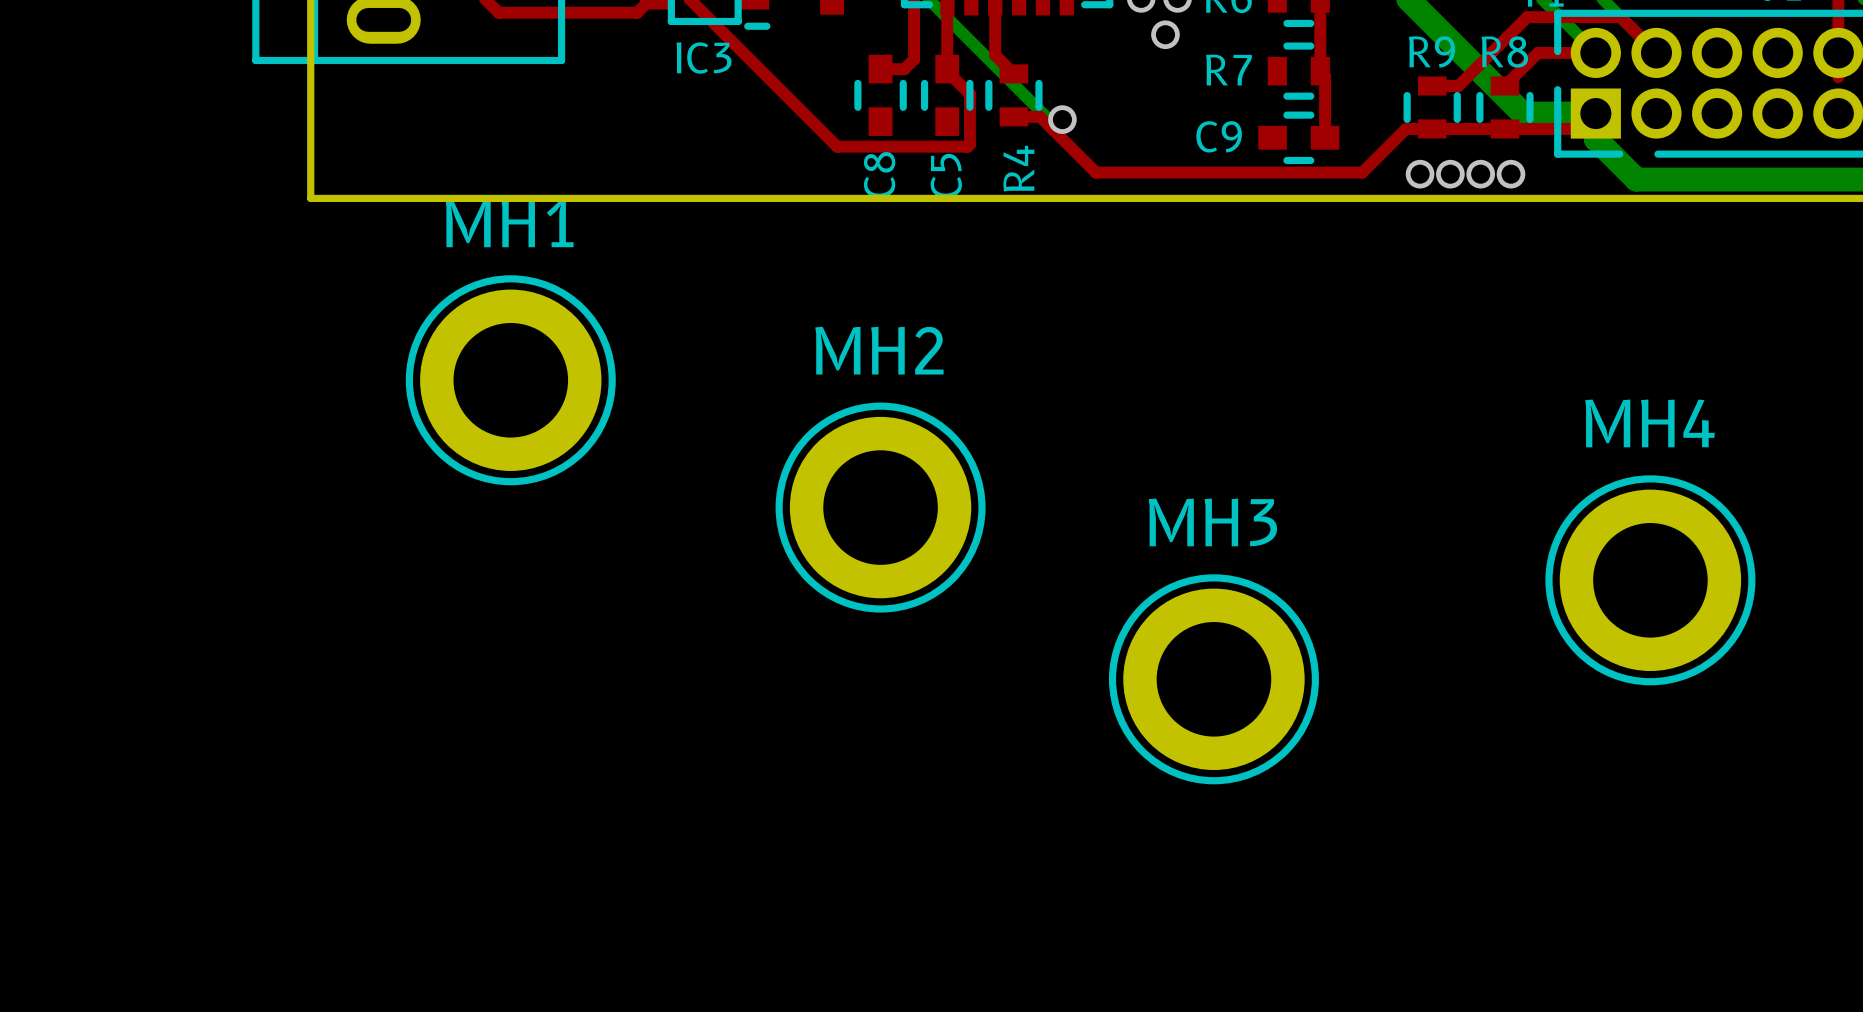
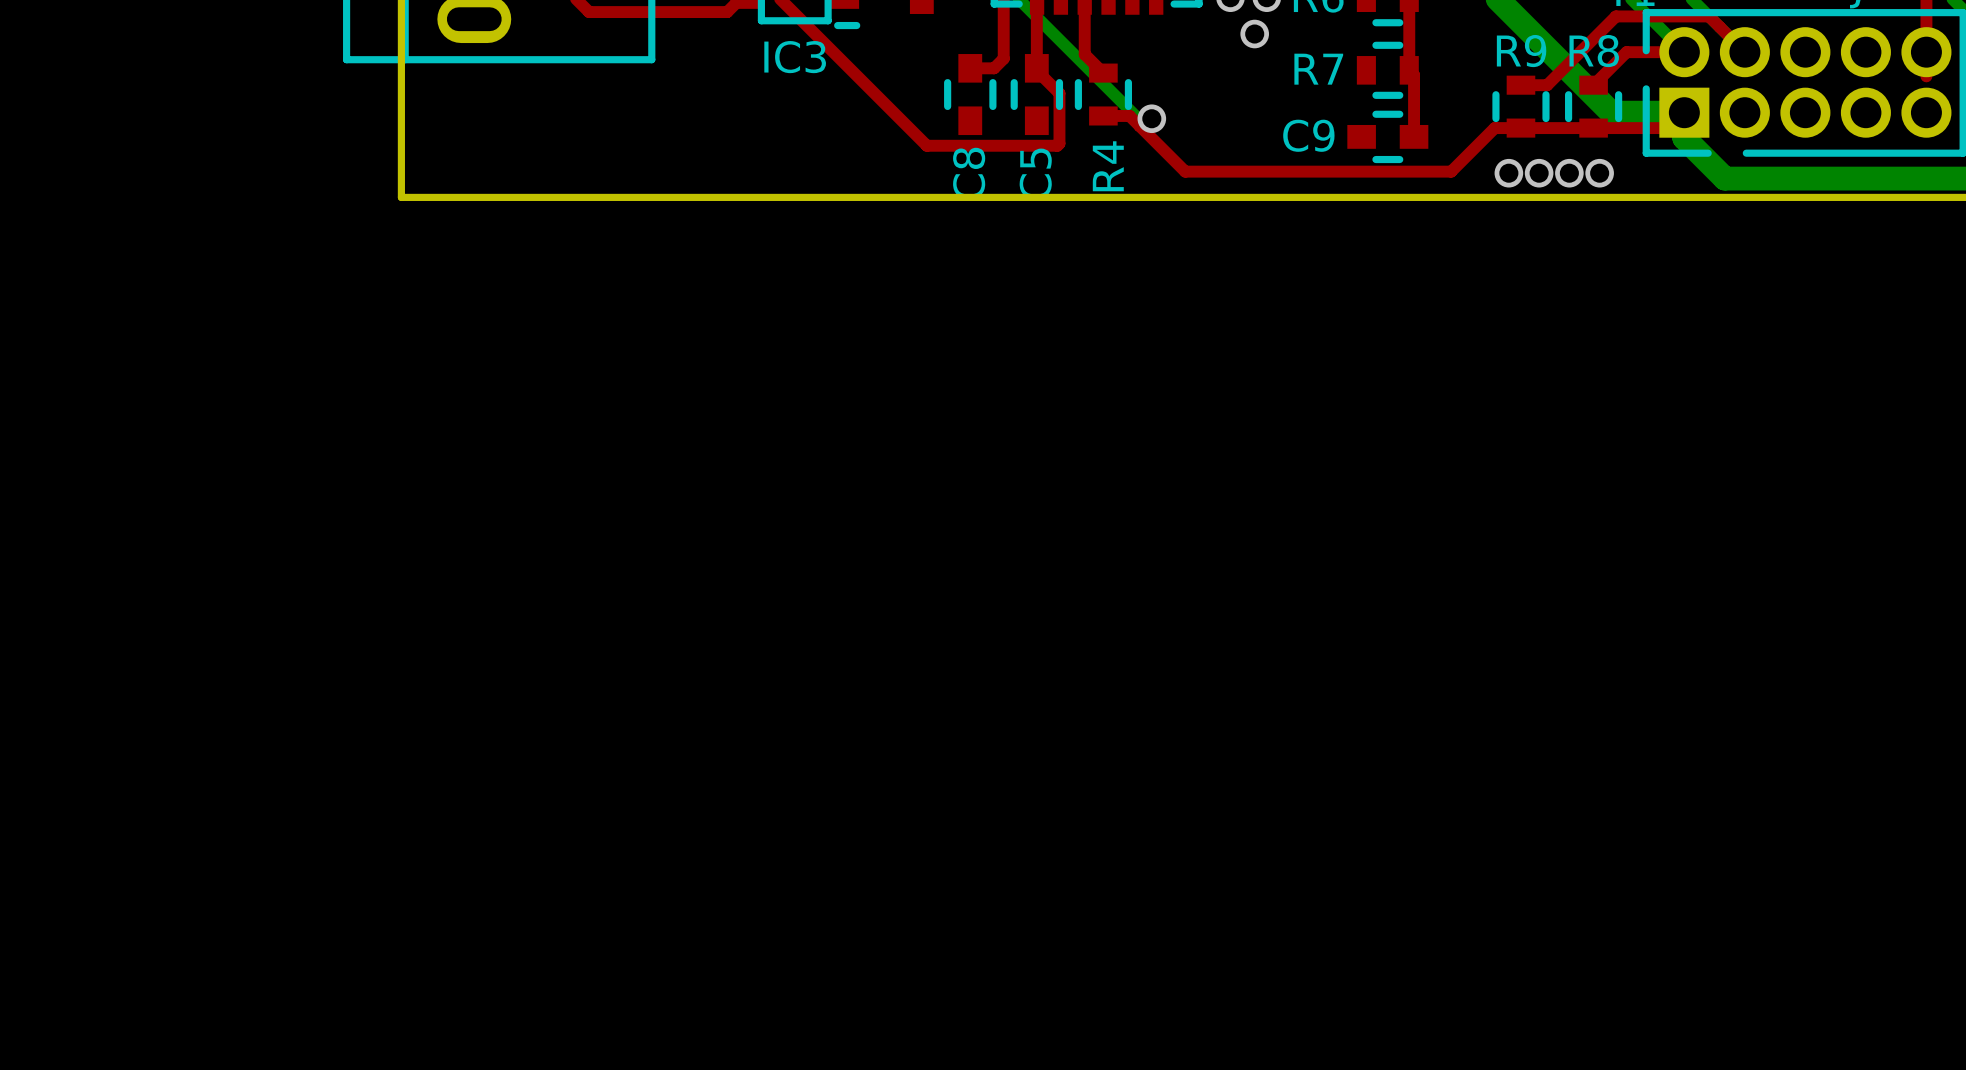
MH1: (510, 380) -> none
MH2: (880, 507) -> none
MH4: (1650, 580) -> none
MH3: (1213, 679) -> none

